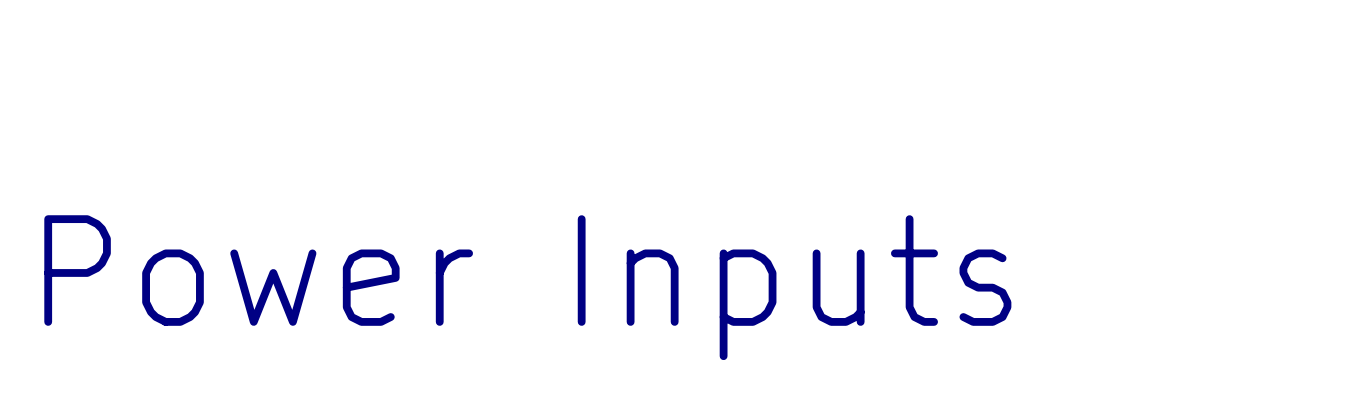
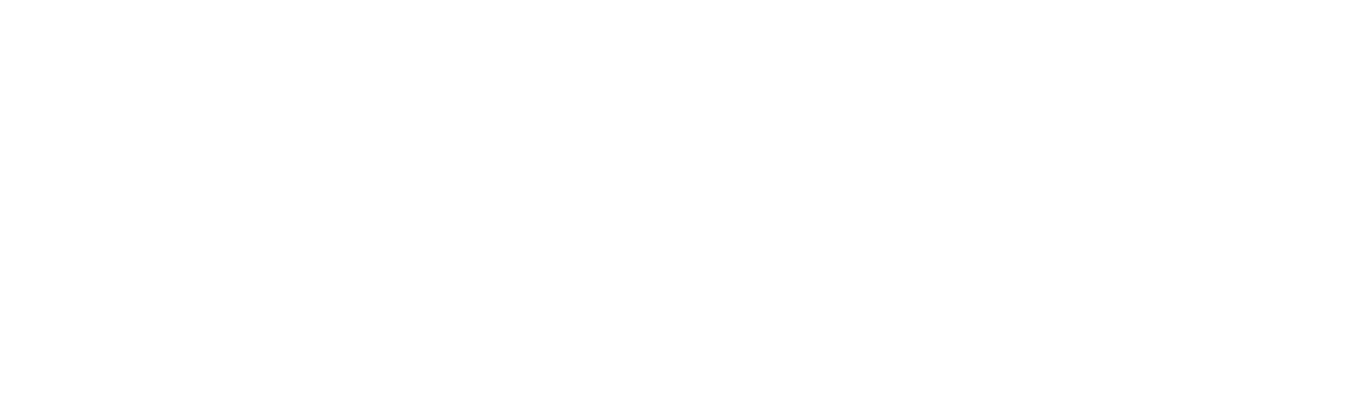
text: Power Inputs (527, 287) -> none

